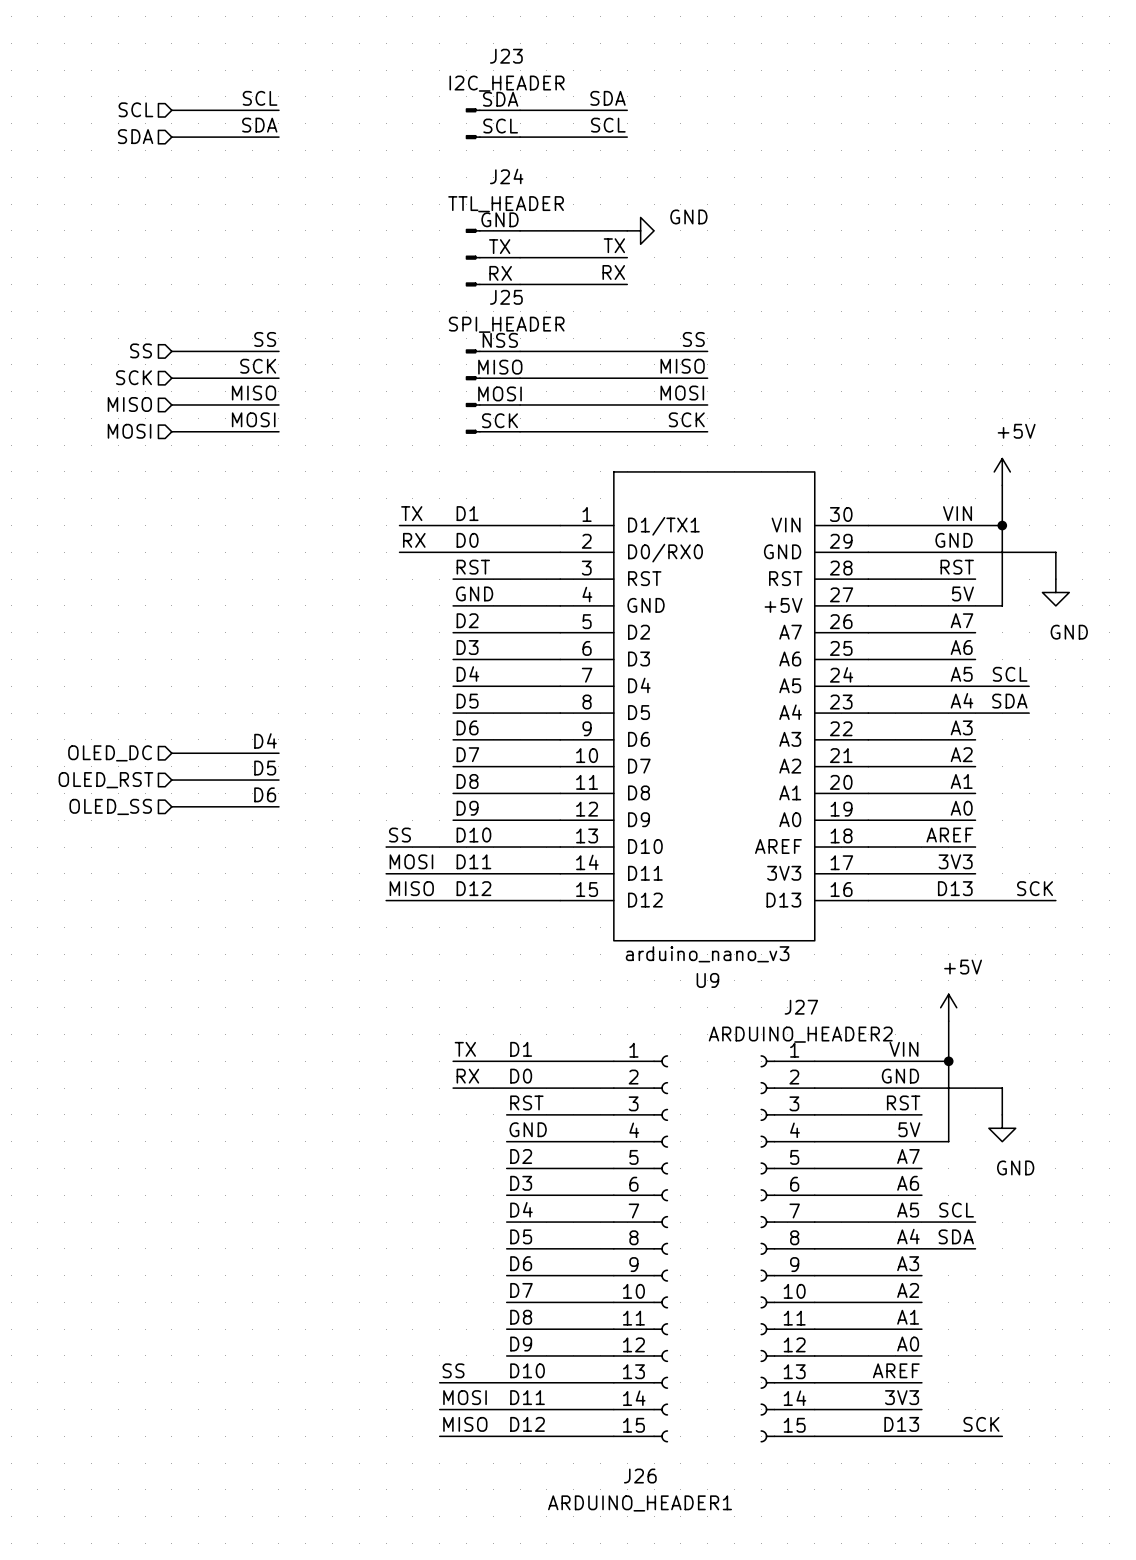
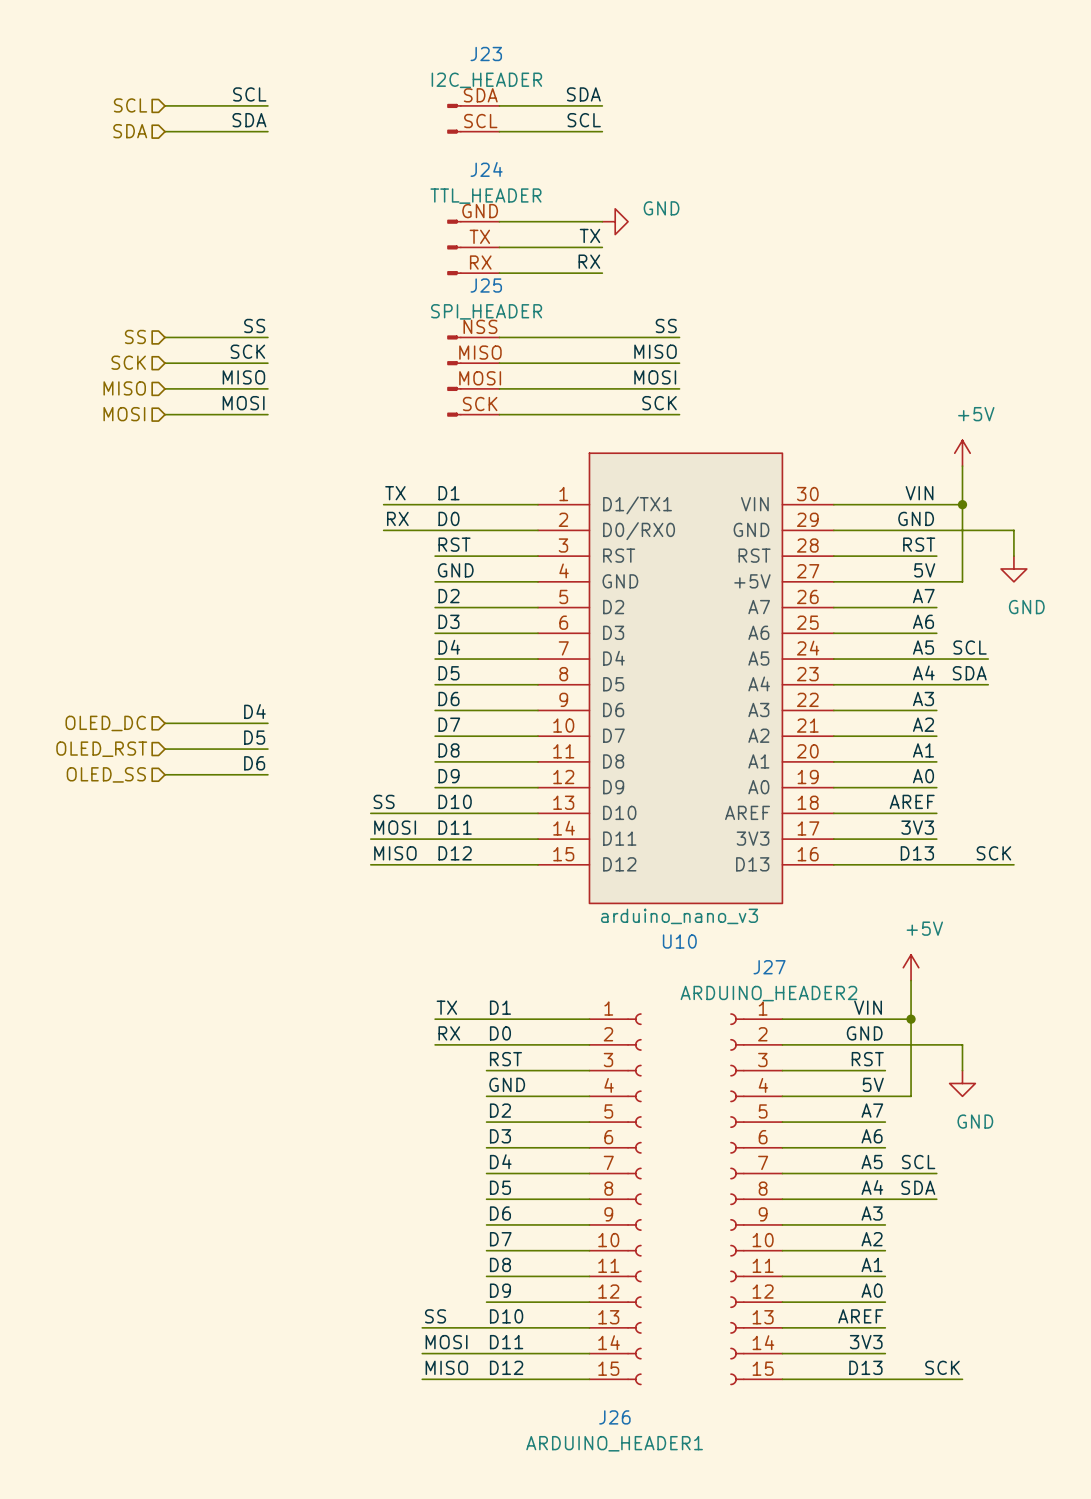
U9 name: U9 (707, 980) -> U10 (679, 941)

